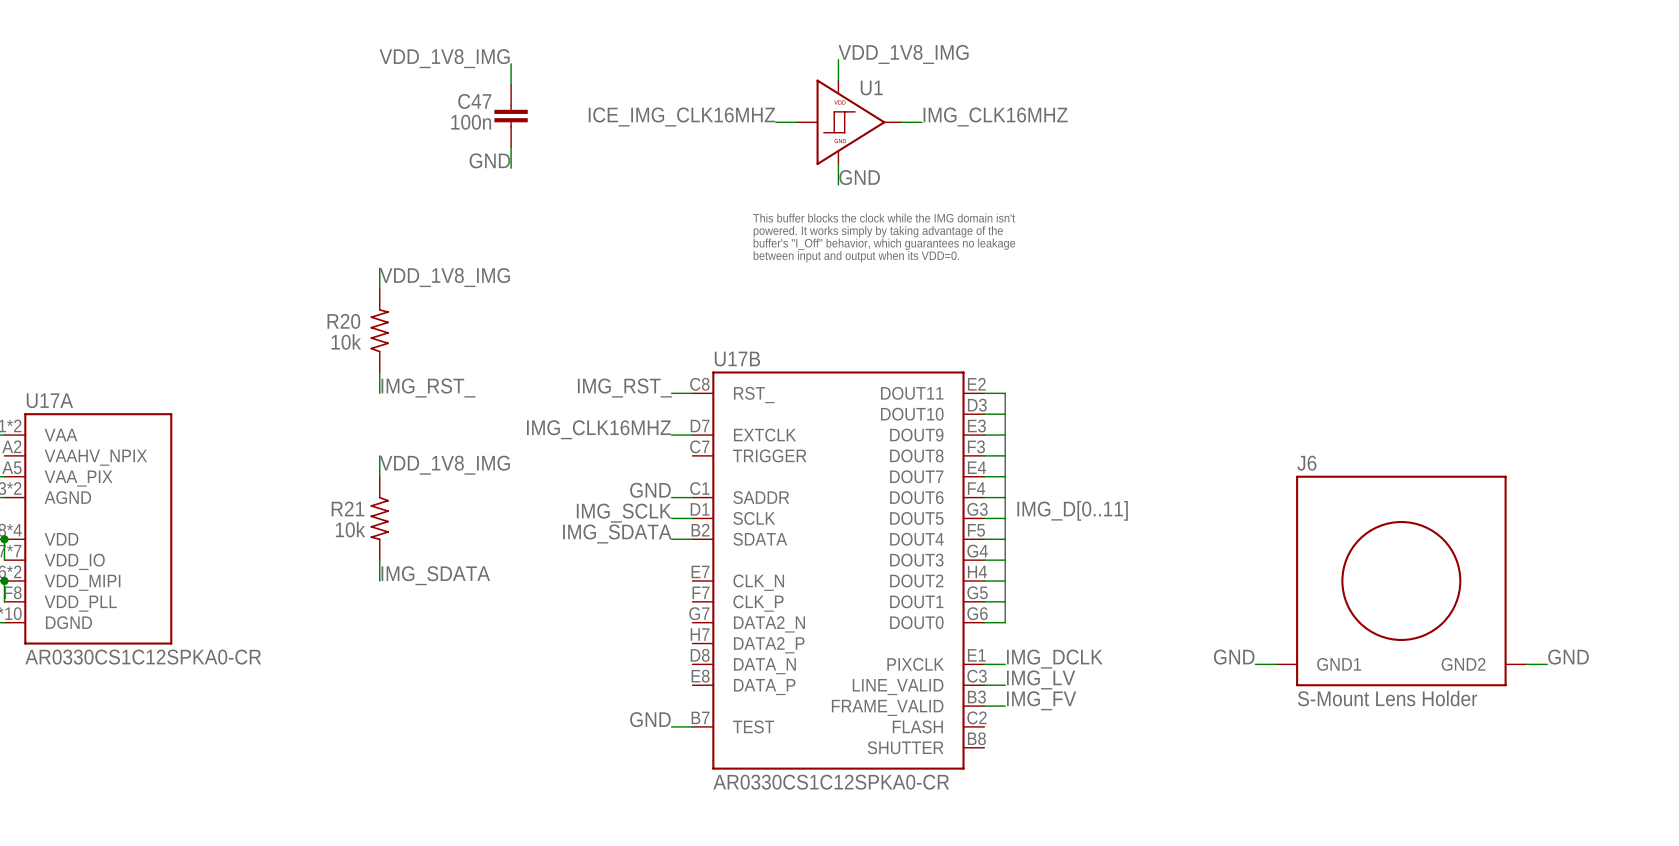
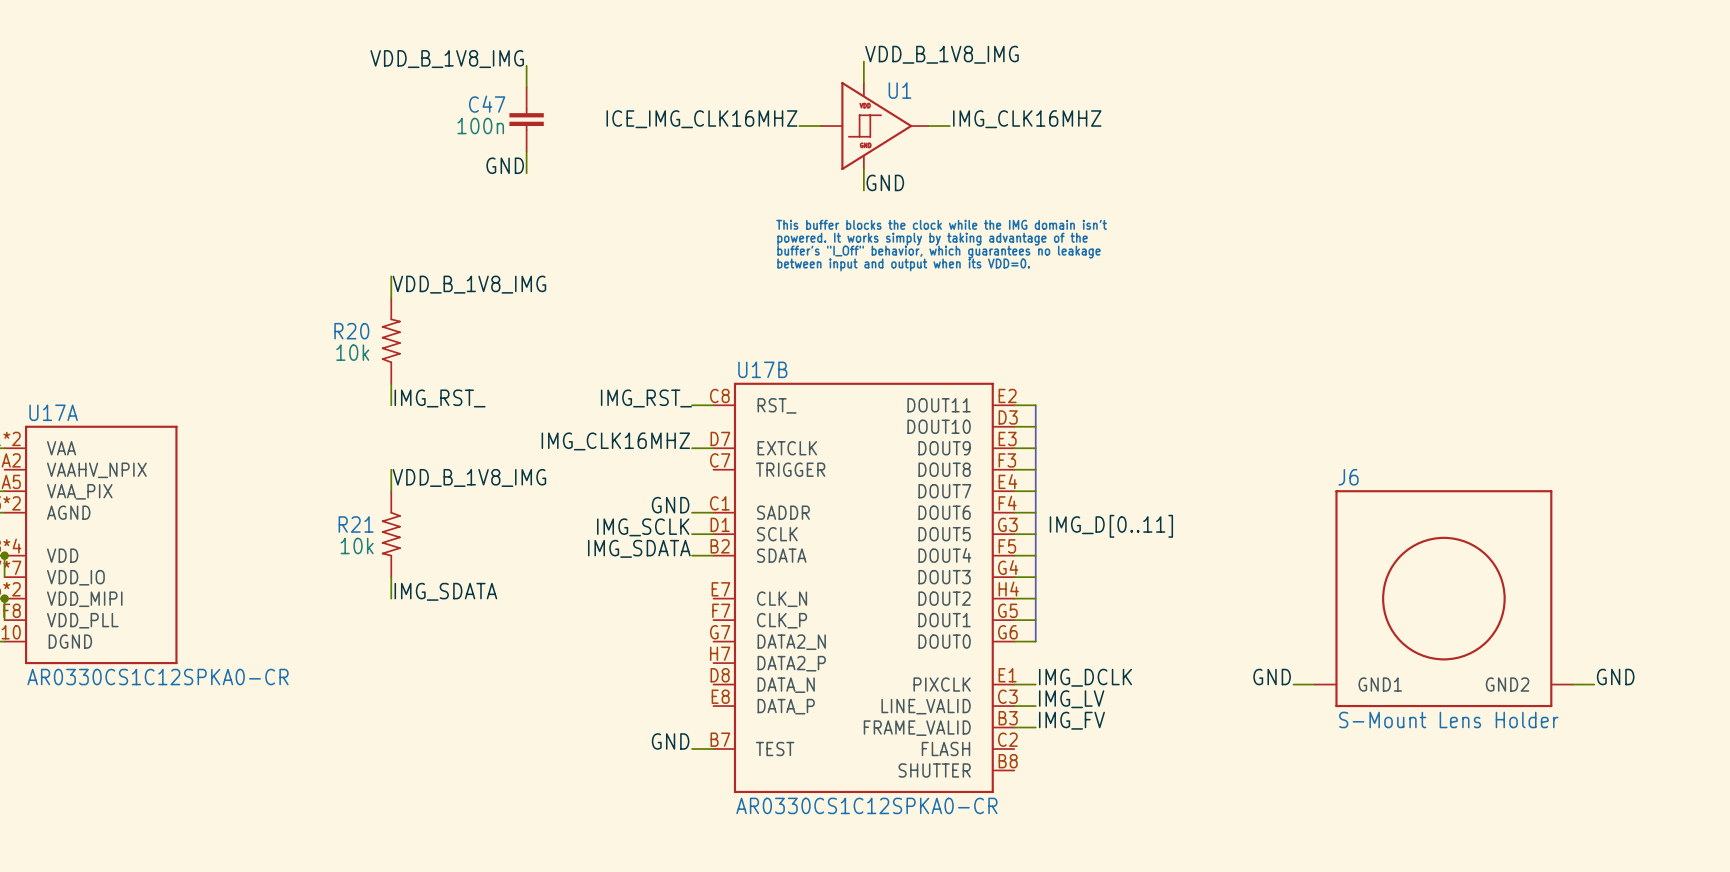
label: VDD_1V8_IMG (903, 54) -> VDD_B_1V8_IMG (942, 54)
label: VDD_1V8_IMG (444, 58) -> VDD_B_1V8_IMG (447, 59)
label: VDD_1V8_IMG (444, 277) -> VDD_B_1V8_IMG (469, 284)
label: VDD_1V8_IMG (444, 465) -> VDD_B_1V8_IMG (469, 477)

